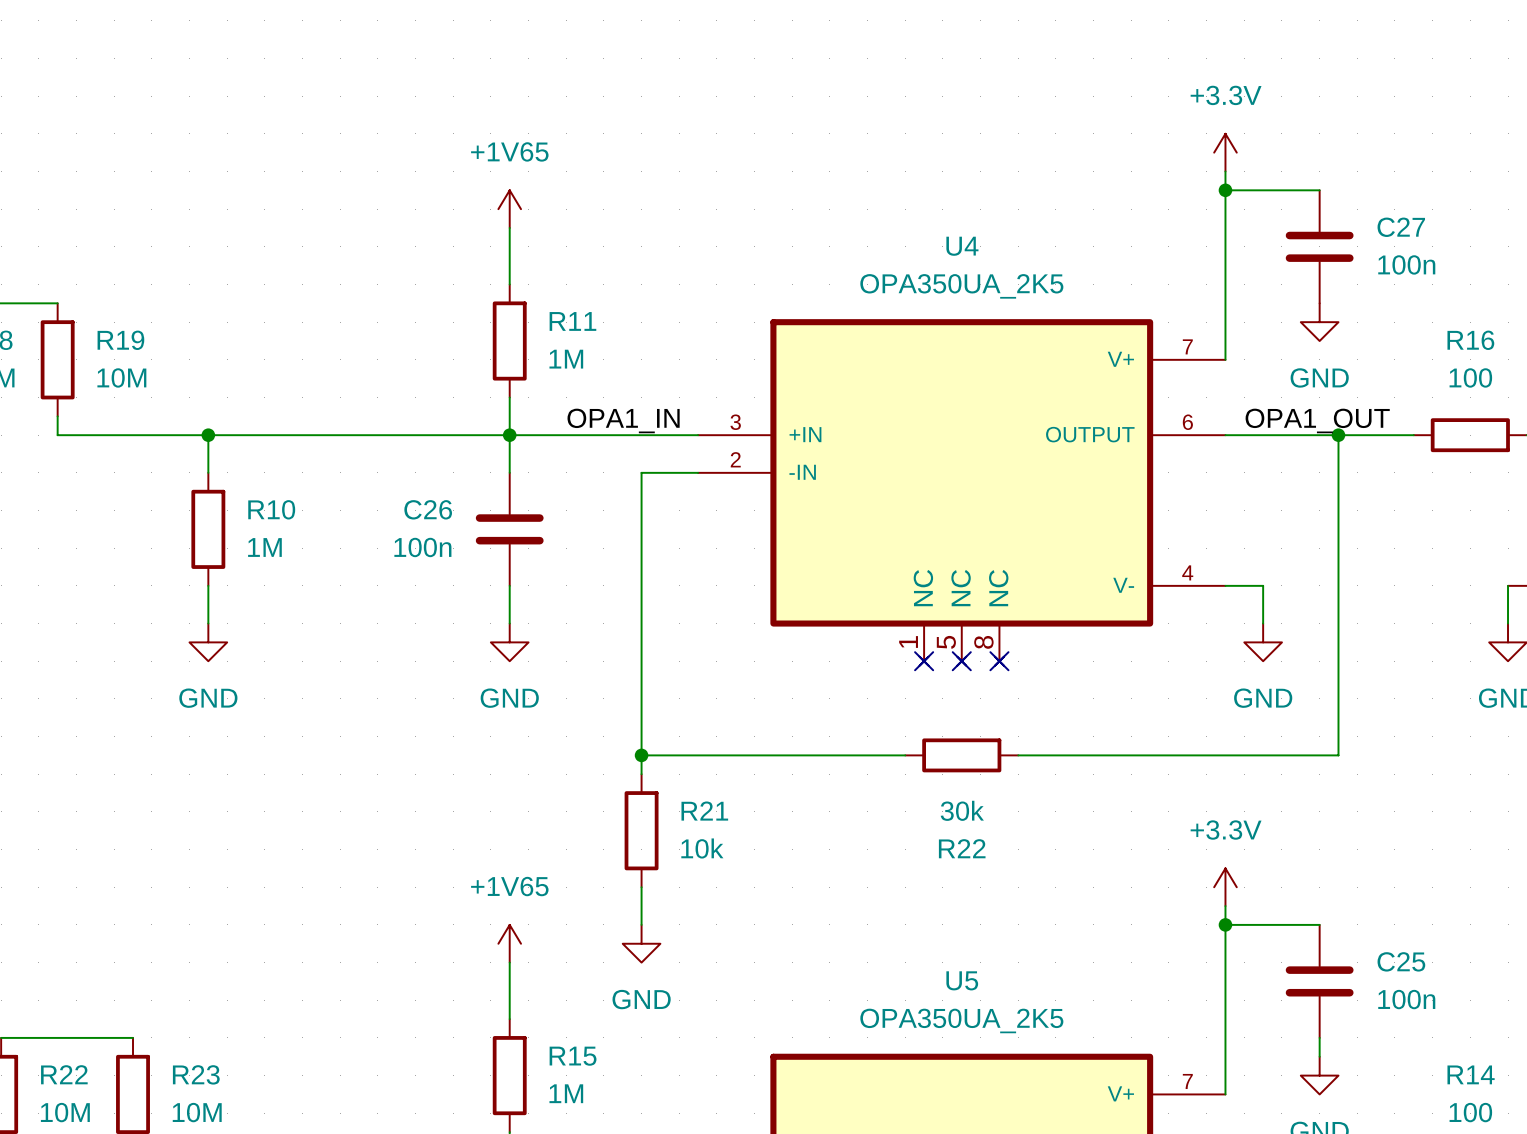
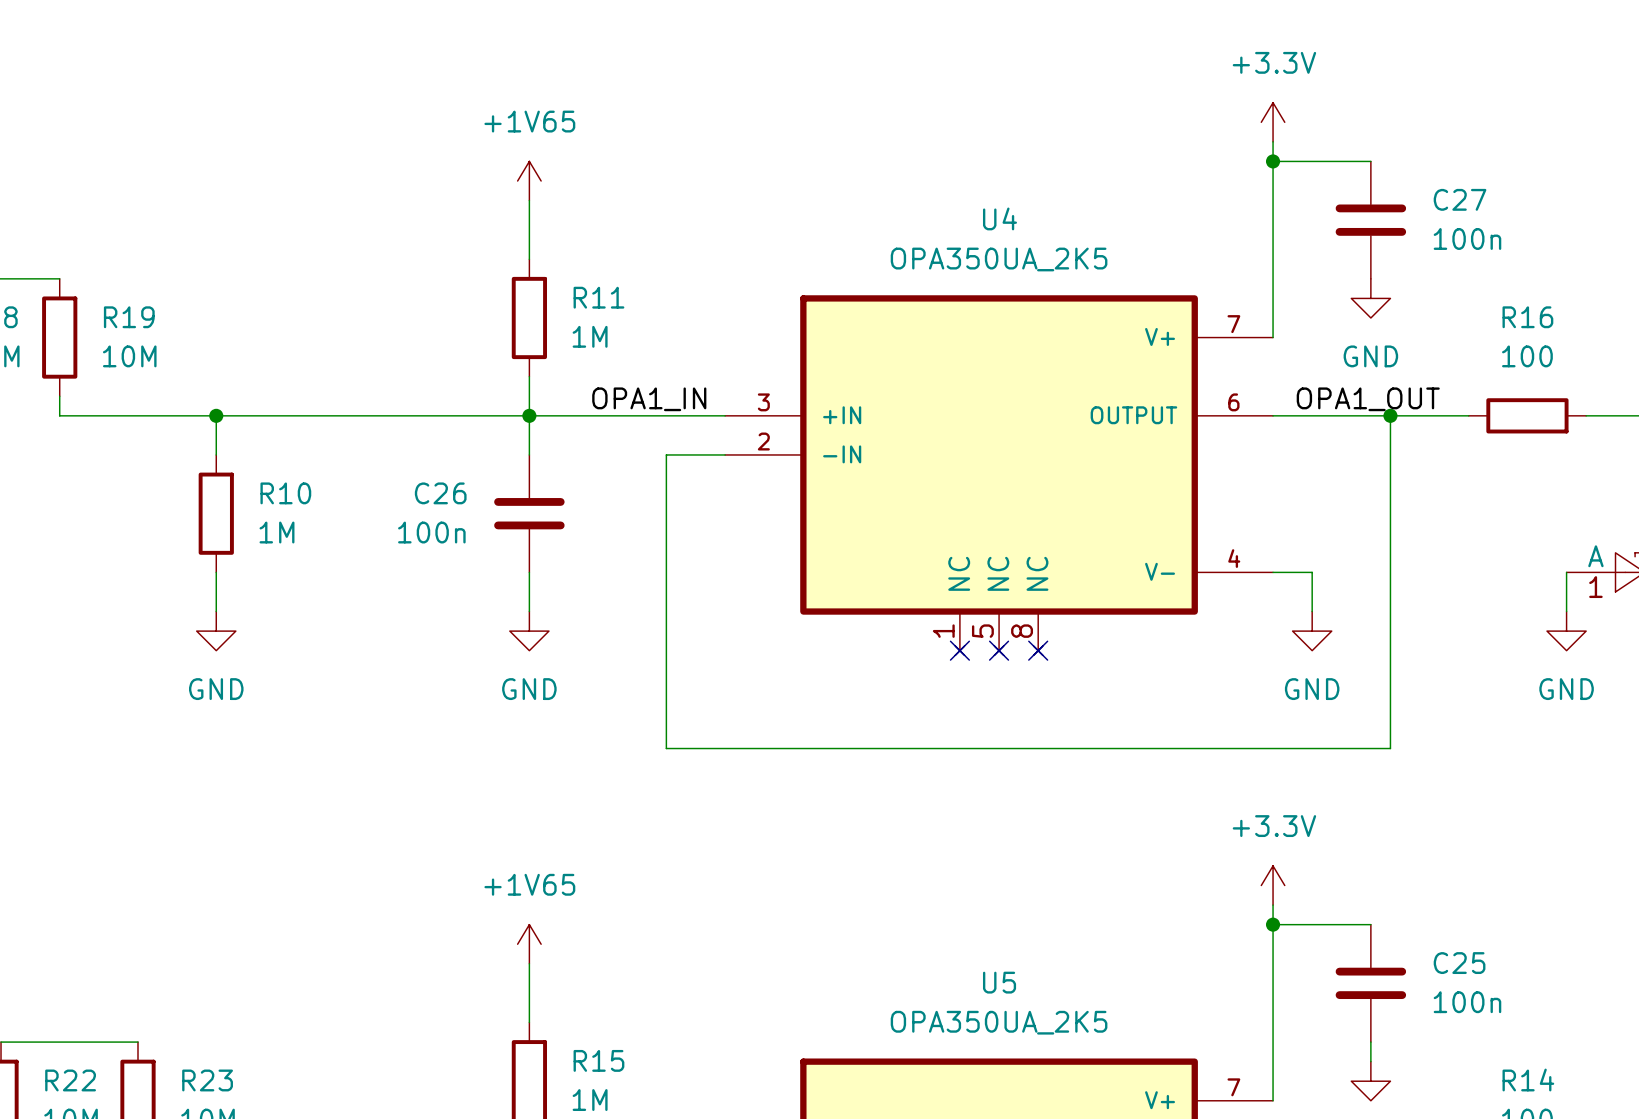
wire: (641, 755) (641, 774) -> none
junction: (641, 755) -> none
wire: none -> (940, 748) (1057, 748)
R22: 30k (961, 755) -> none
R21: 10k (641, 830) -> none
wire: (641, 887) (641, 924) -> none
power symbol: GND (641, 943) -> none

